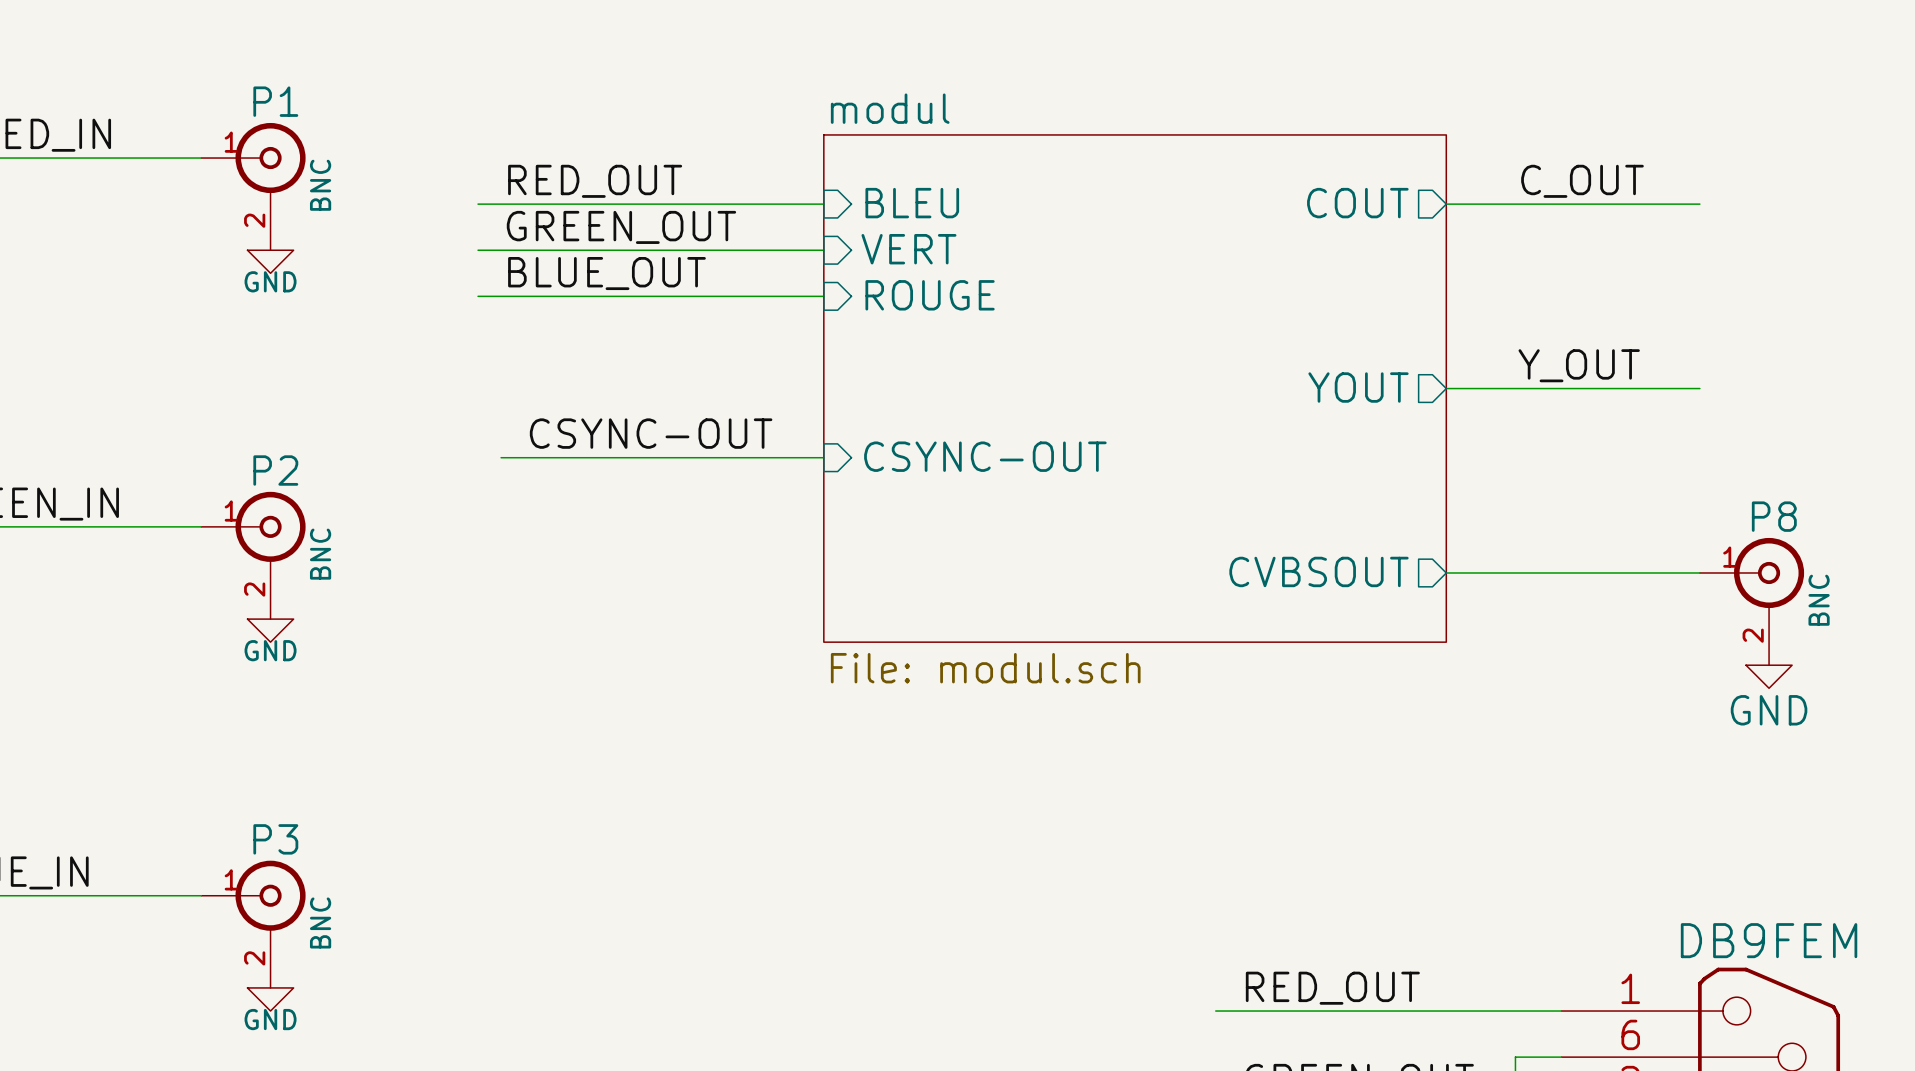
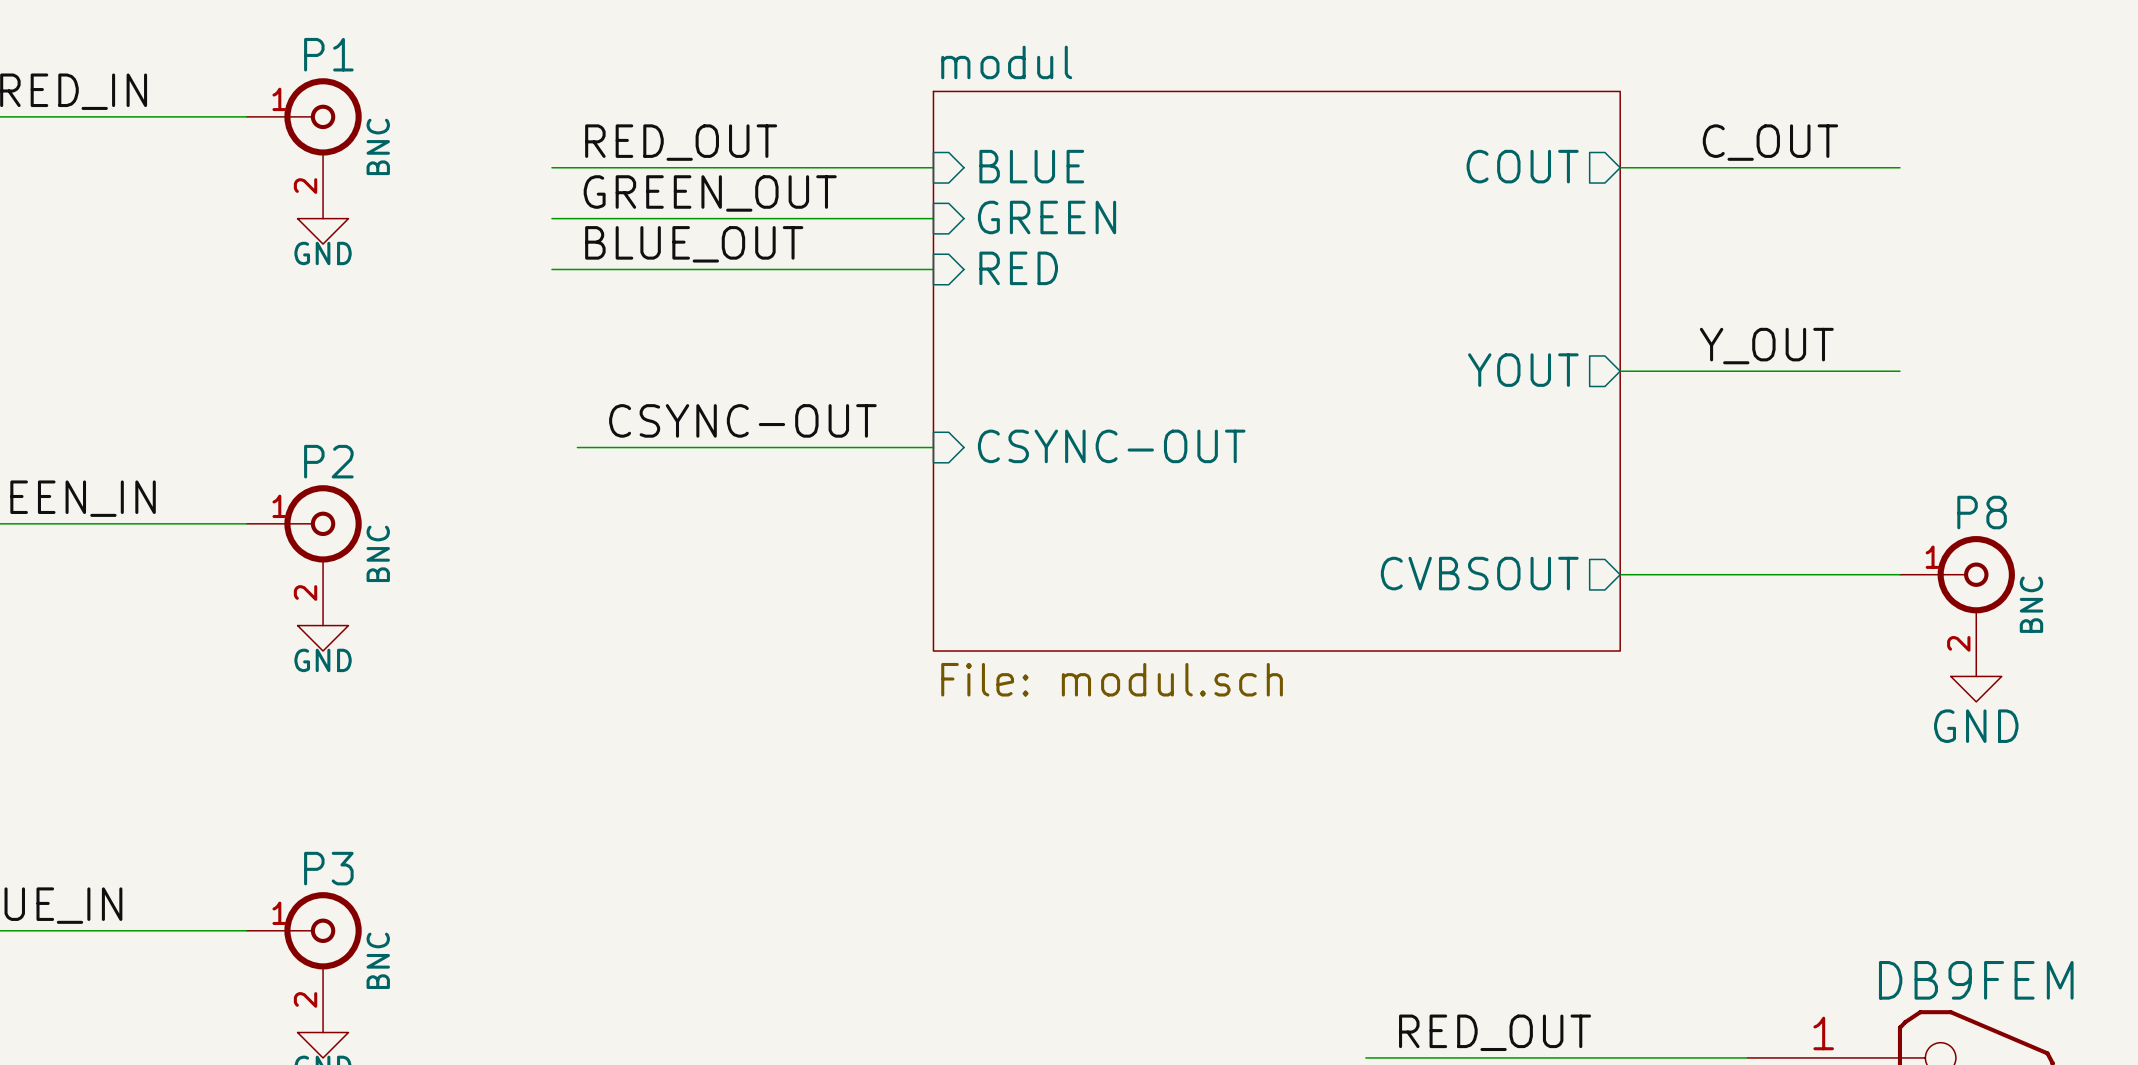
sheet pin: BLEU (912, 203) -> BLUE (1031, 166)
sheet pin: VERT (908, 249) -> GREEN (1047, 217)
sheet pin: ROUGE (930, 295) -> RED (1018, 268)

